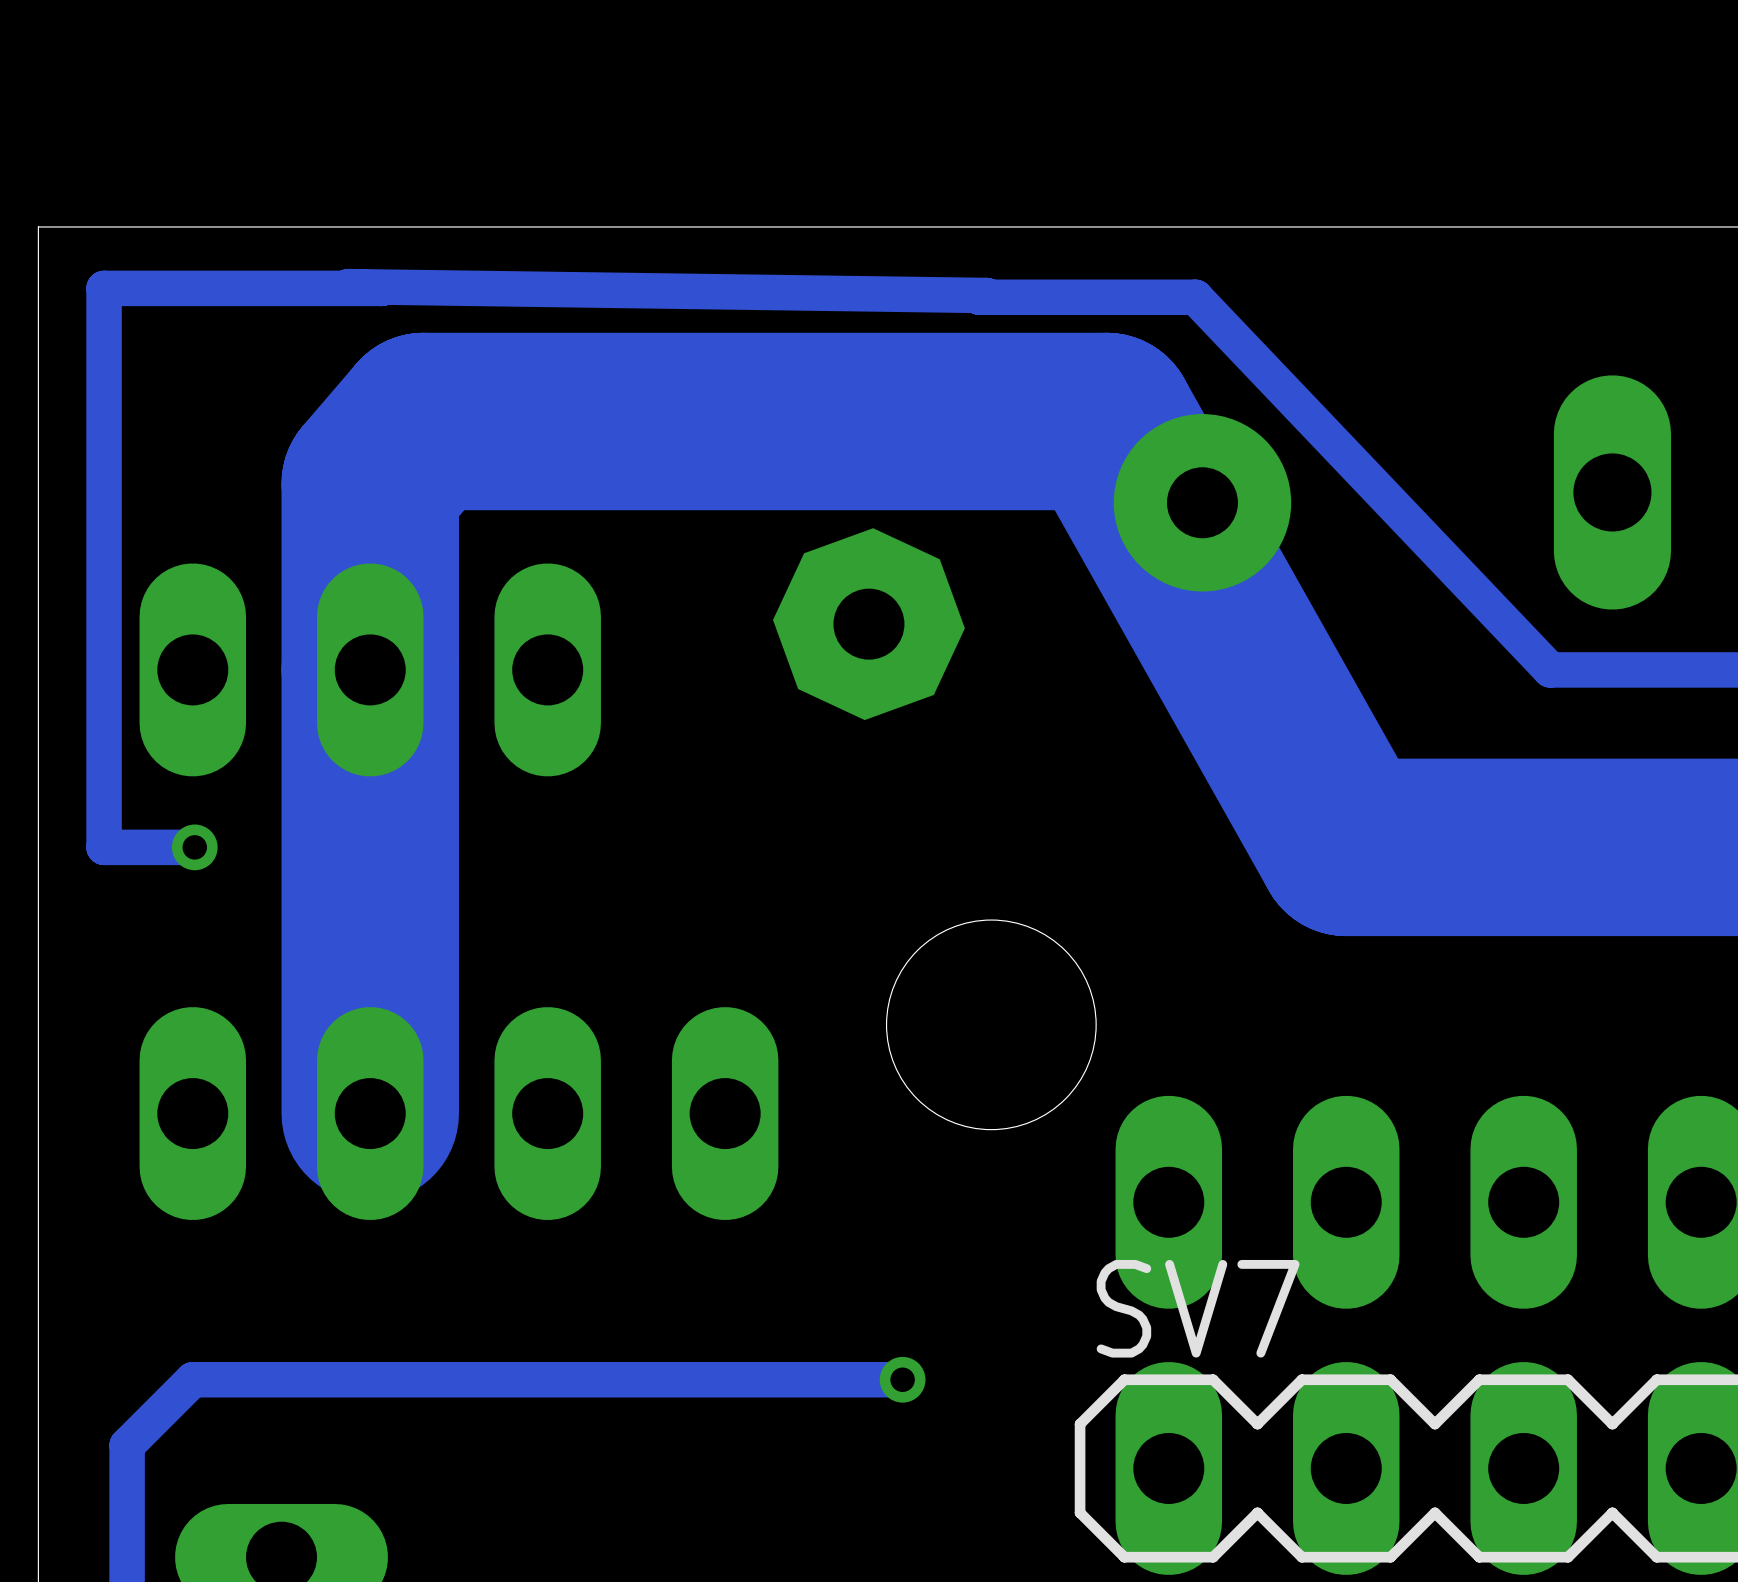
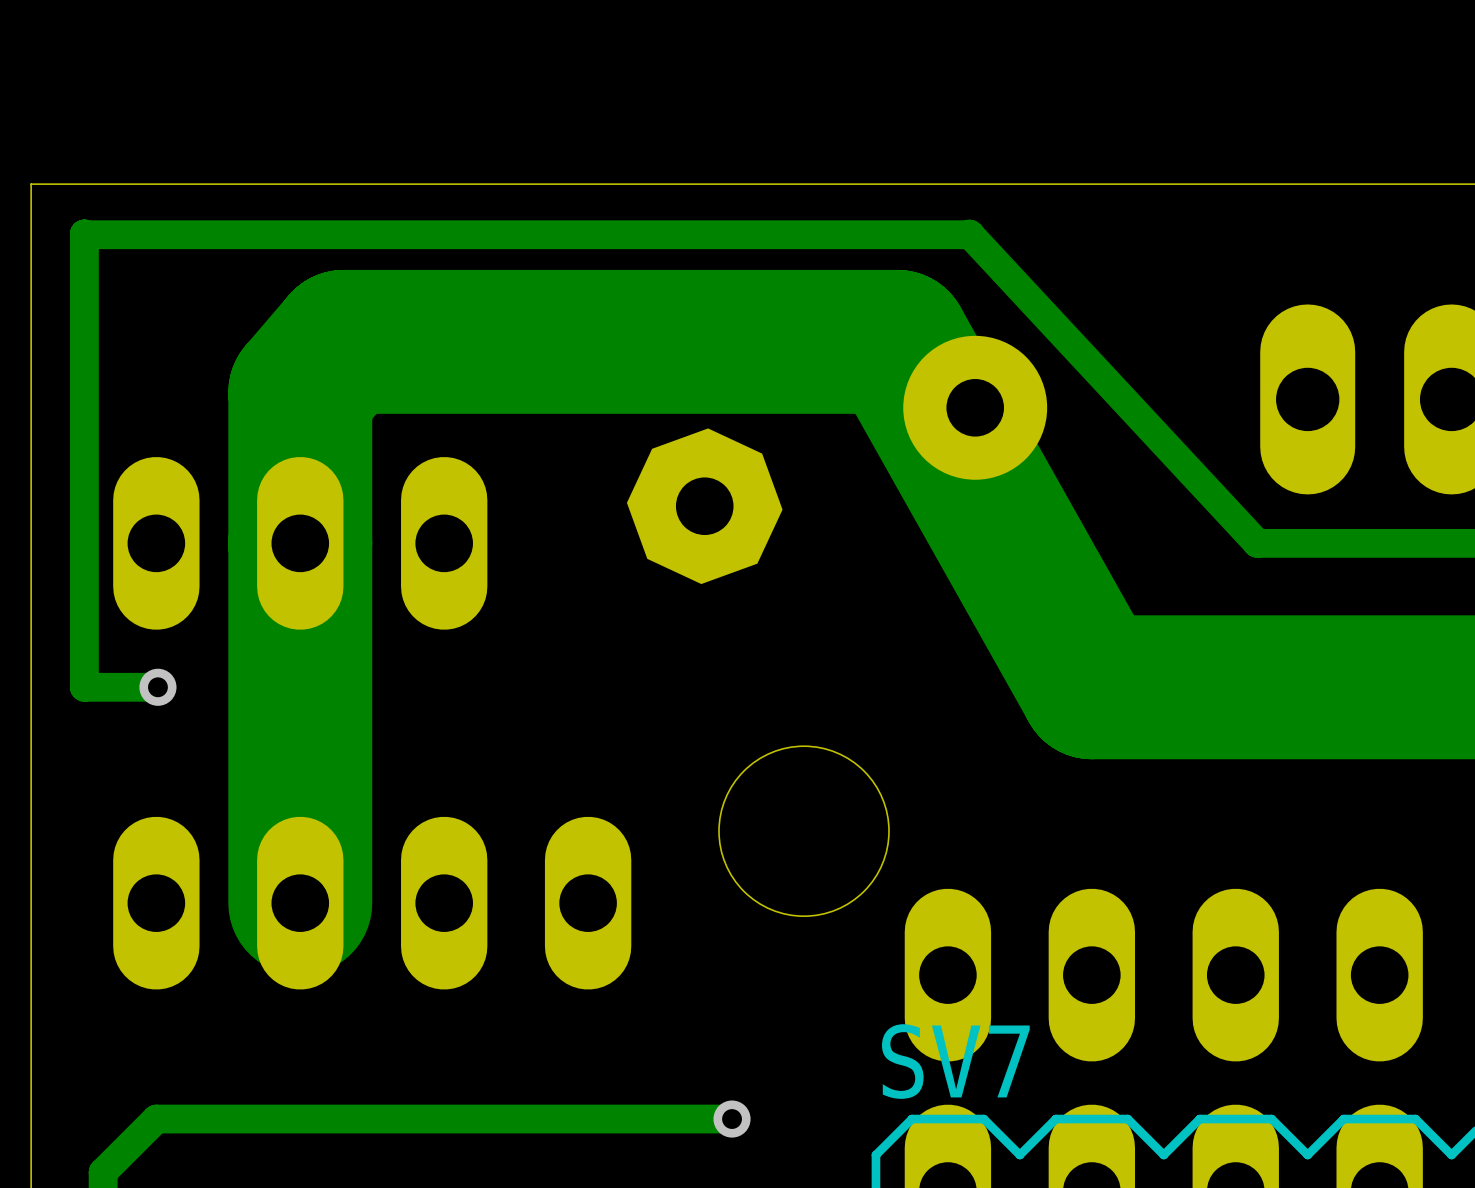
track: (104, 288) (382, 288) (348, 286) (986, 295) (979, 297) (1195, 297) (1550, 669) -> (84, 233) (970, 234)
track: none -> (969, 233) (1257, 543)

